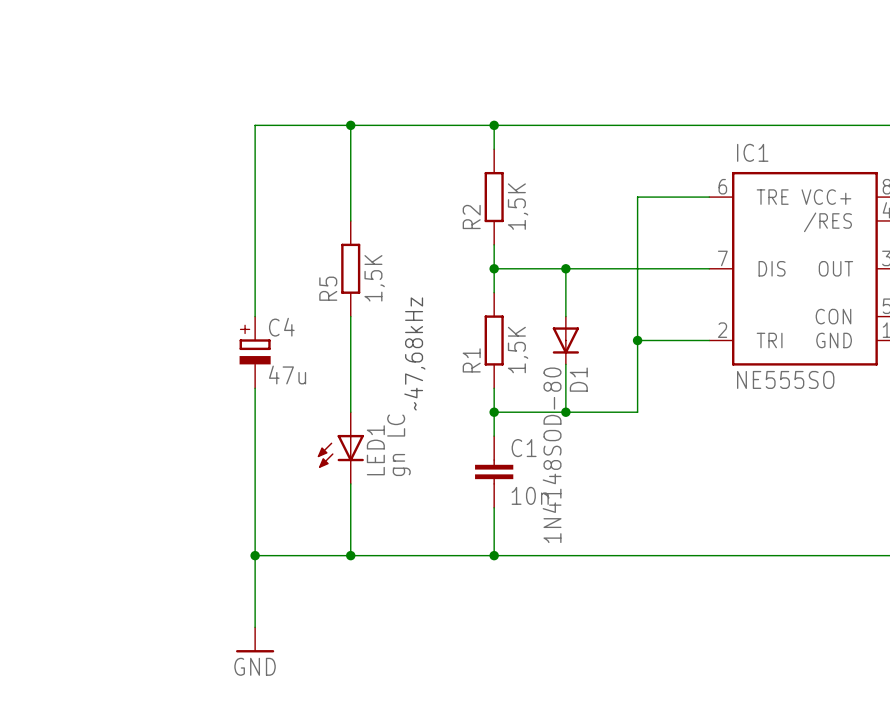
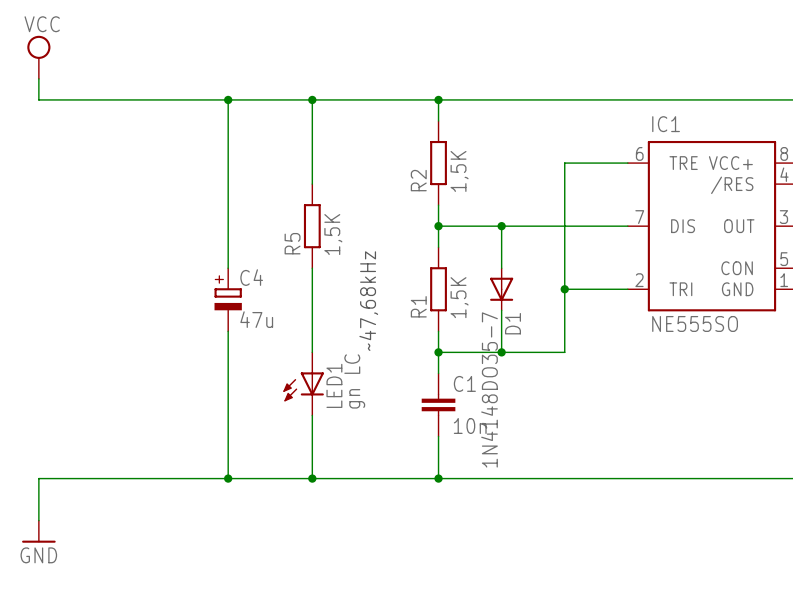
power symbol: none -> VCC (38, 57)
wire: none -> (38, 78) (38, 99) (228, 99)
junction: none -> (228, 99)
D1 value: 1N4148SOD-80 (552, 455) -> 1N4148DO35-7 (489, 389)
wire: (255, 555) (255, 627) -> (228, 478) (38, 478) (38, 520)
power symbol position: GND (255, 639) -> GND (38, 531)

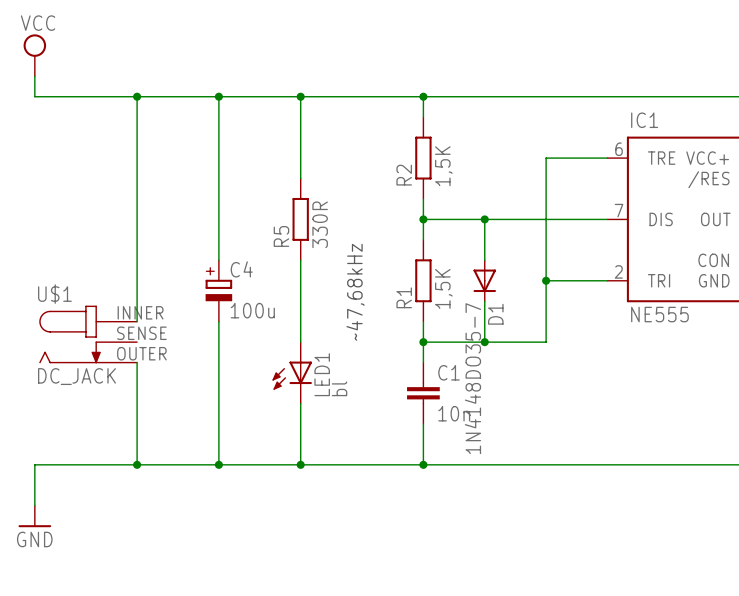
wire: none -> (137, 96) (137, 321)
junction: none -> (137, 96)
R5 value: 1,5K (333, 234) -> 330R (320, 224)
C4 value: 47u (256, 319) -> 100u (252, 310)
IC1 value: NE555SO (695, 323) -> NE555 (659, 314)
U$1: none -> DC_JACK (88, 334)
wire: none -> (137, 362) (137, 464)
LED1 value: gn LC (354, 381) -> bl (339, 388)
junction: none -> (137, 464)

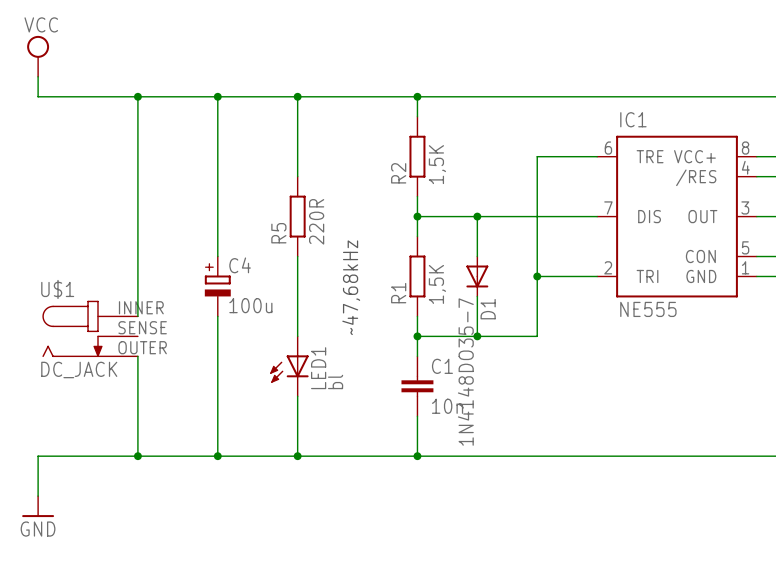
R5 value: 330R (320, 224) -> 220R (316, 221)

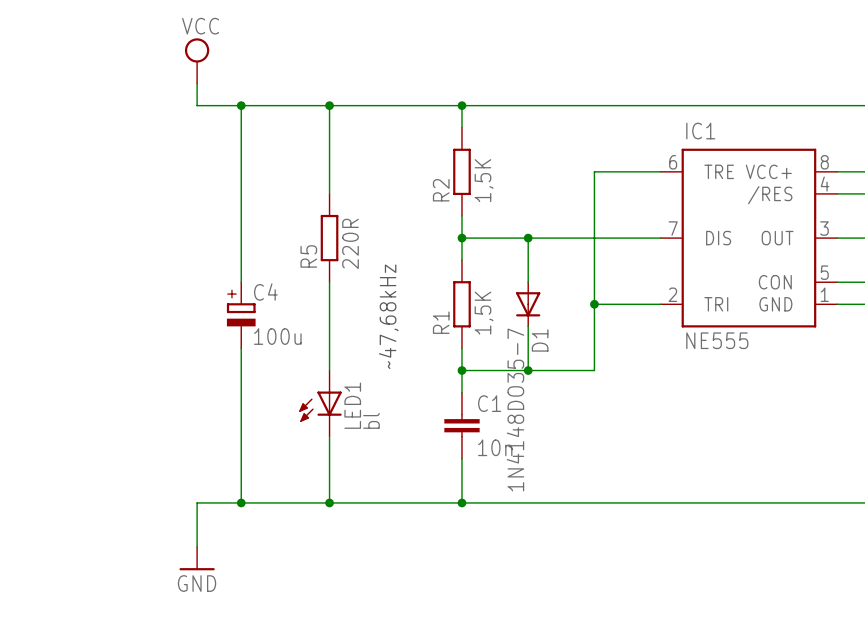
power symbol position: VCC (38, 56) -> VCC (197, 60)
wire: (38, 76) (38, 96) (177, 96) -> (197, 83) (197, 105)
wire: (137, 96) (137, 316) -> none
junction: (137, 96) -> none
U$1: DC_JACK (90, 328) -> none
wire: (137, 356) (137, 456) -> none
junction: (137, 456) -> none
wire: (177, 456) (38, 456) (38, 496) -> (197, 502) (197, 547)
power symbol position: GND (38, 506) -> GND (197, 558)

